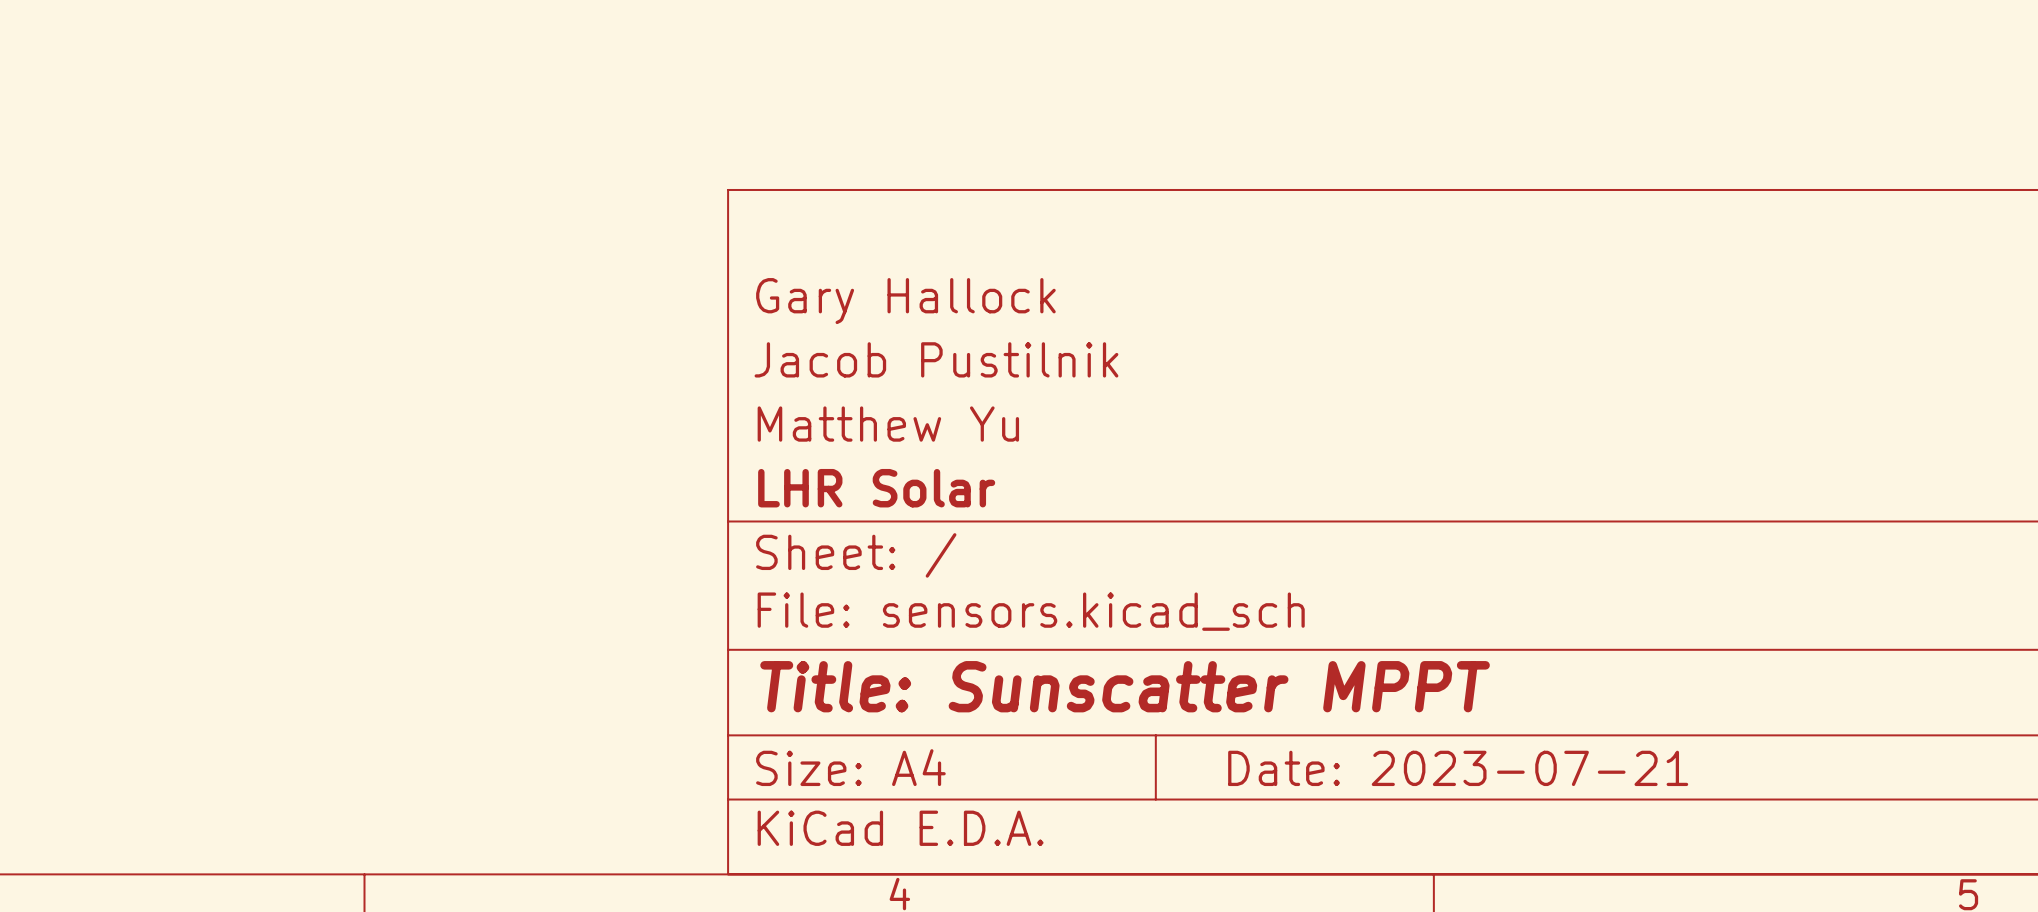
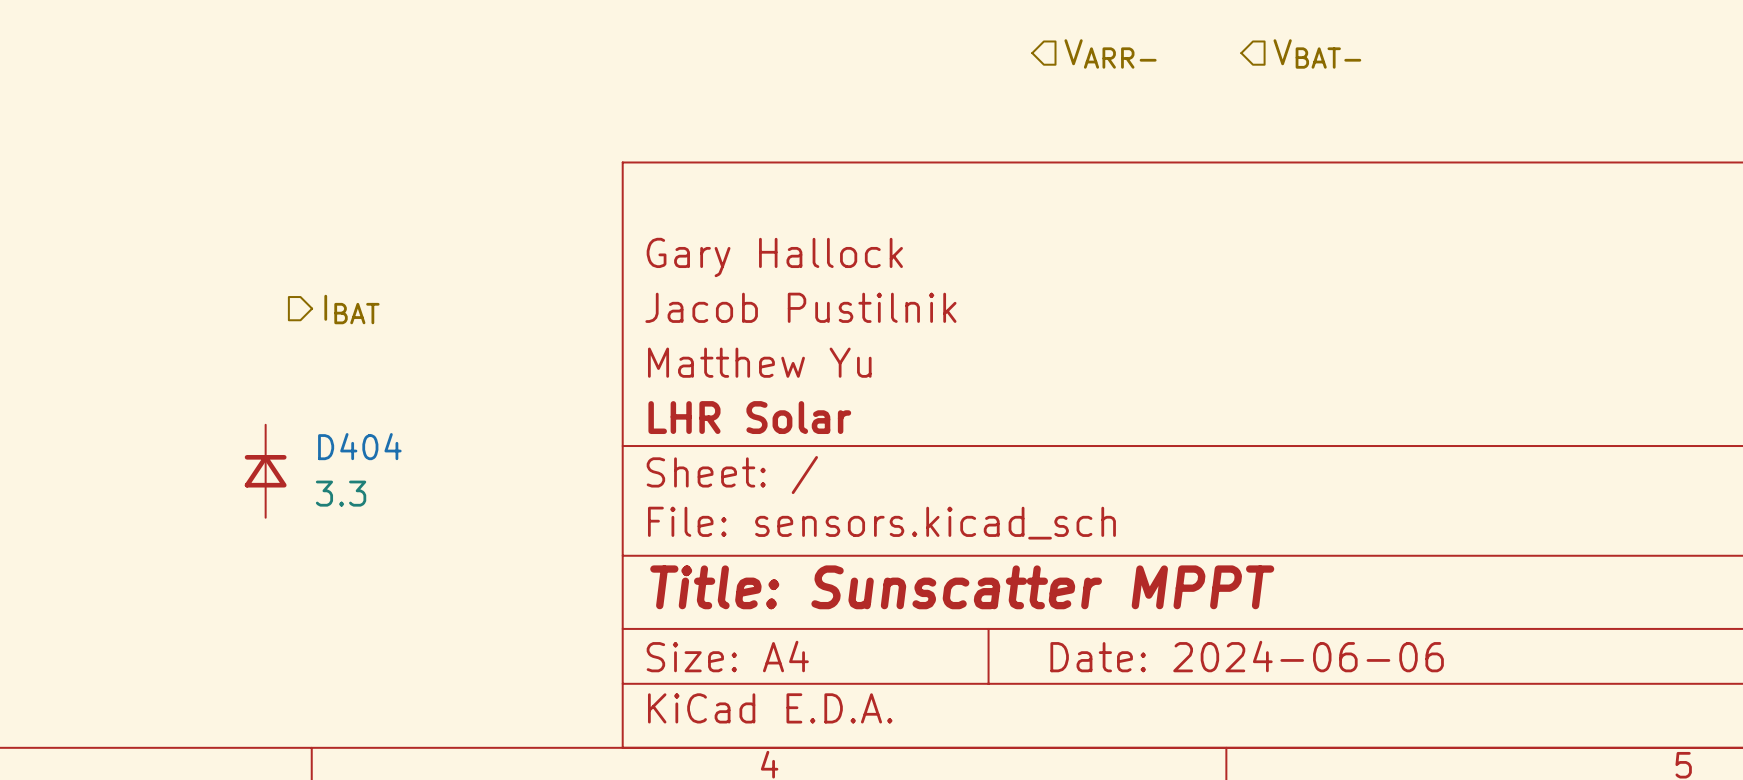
hierarchical label: none -> VARR- (1110, 53)
hierarchical label: none -> VBAT- (1317, 53)
hierarchical label: none -> IBAT (351, 309)
D404: none -> 3.3 (265, 471)
title block: Date: 2023-07-21 (1458, 768) -> Date: 2024-06-06 (1247, 656)

